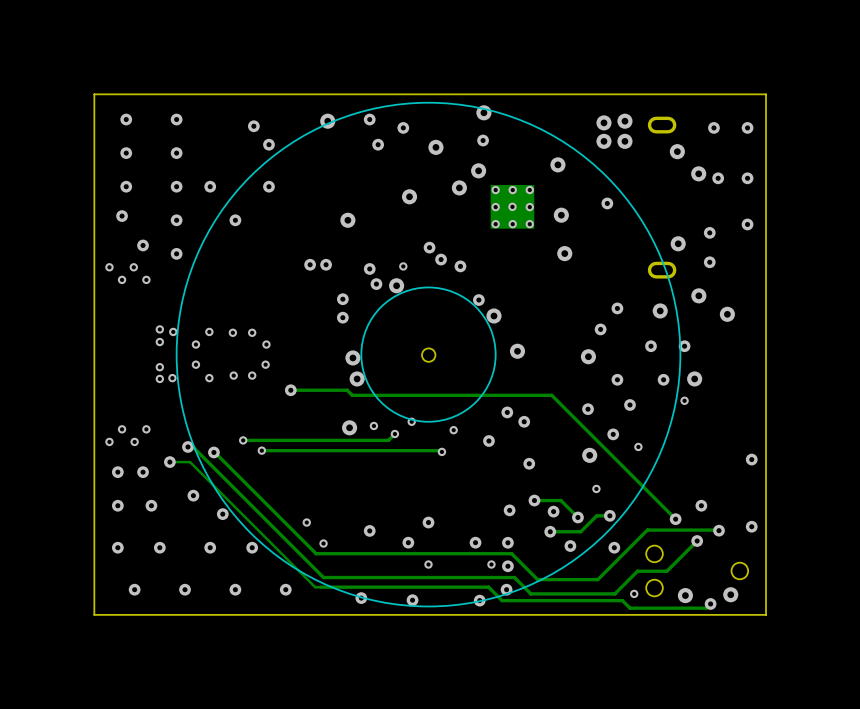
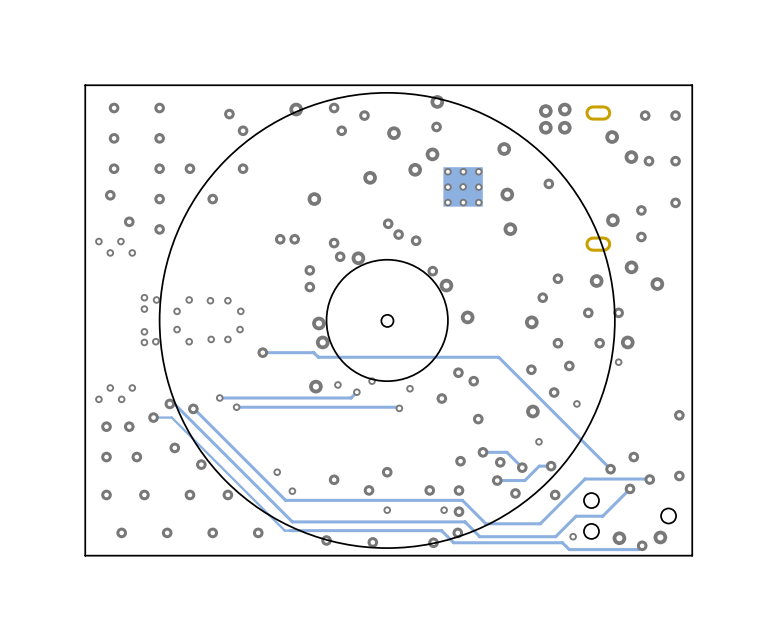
via: (403, 266) -> none

